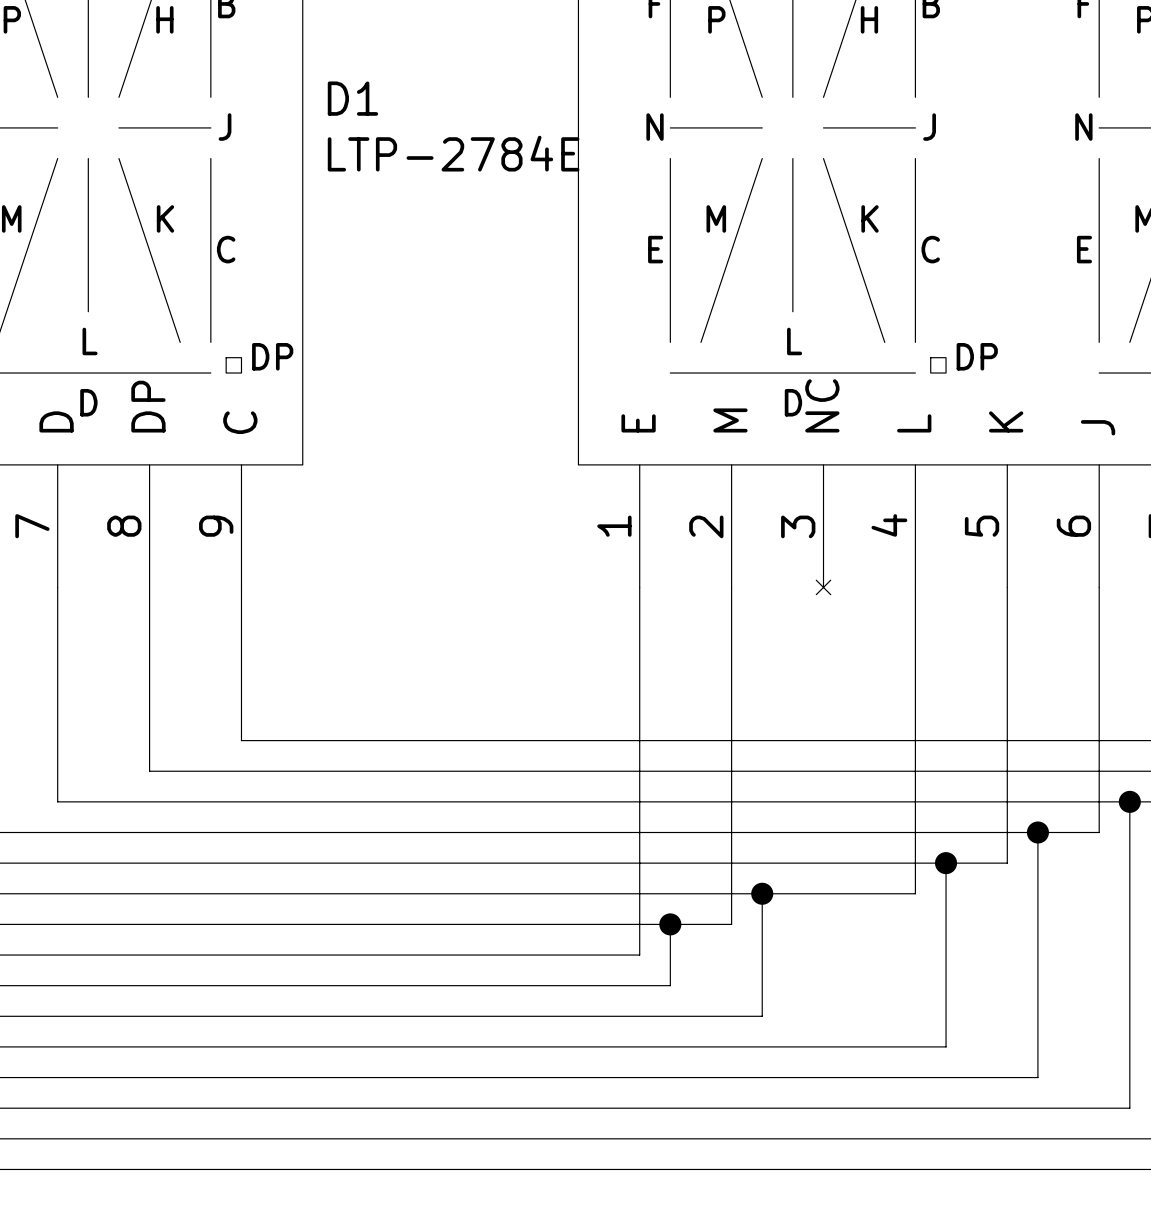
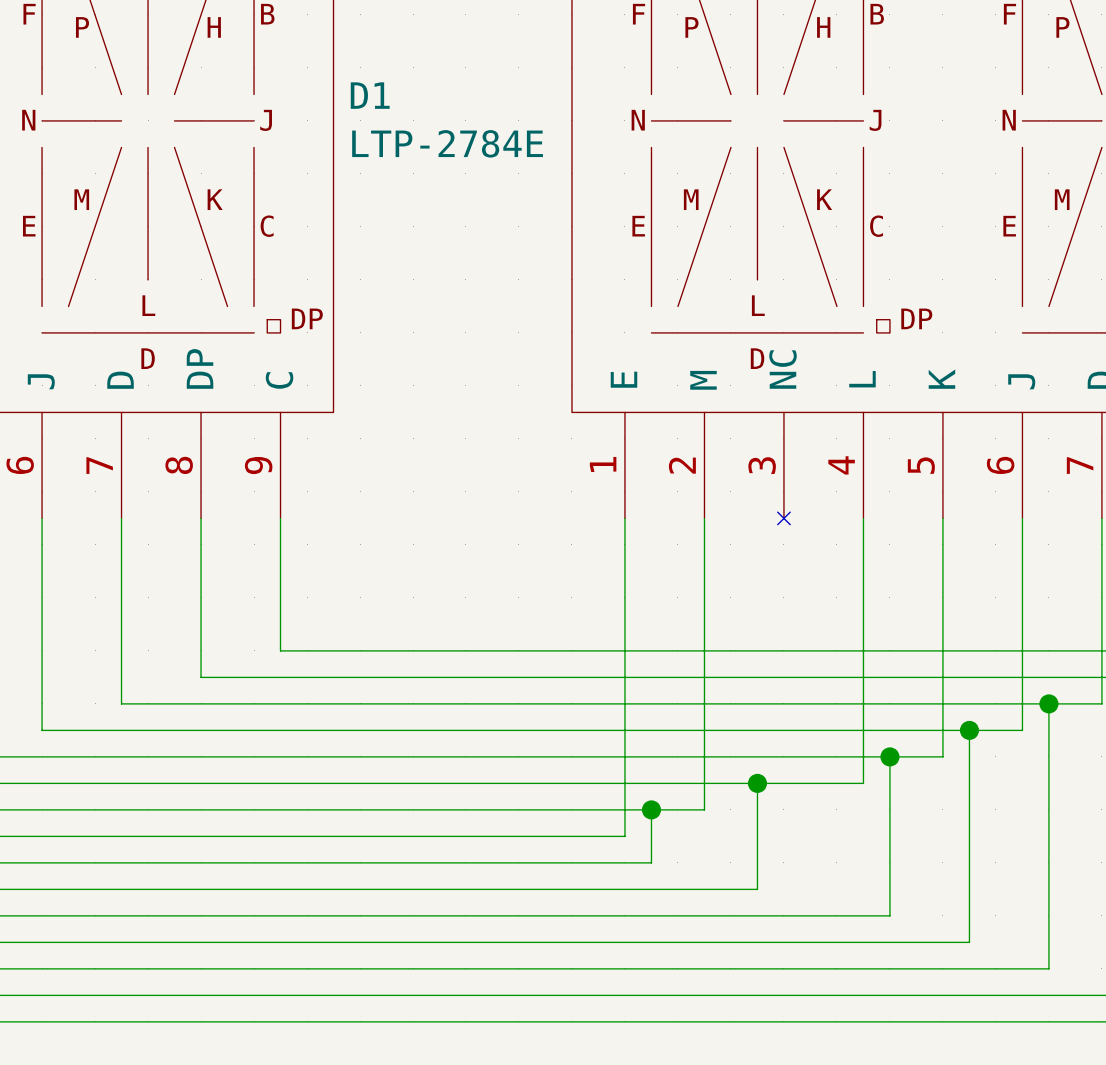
wire: (762, 893) (762, 1016) -> (757, 783) (757, 889) (730, 889)
junction position: (762, 893) -> (757, 783)

